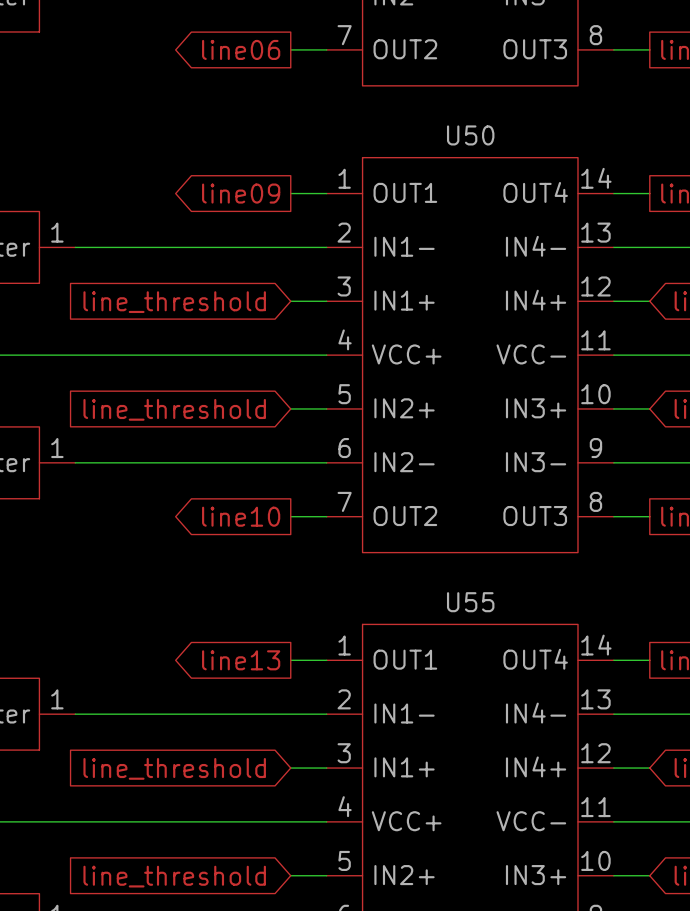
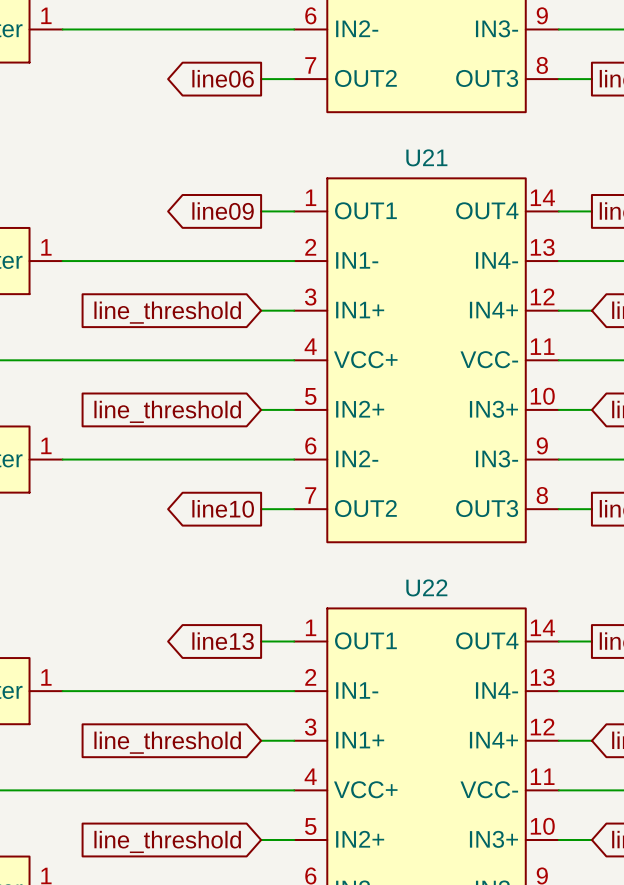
U50 name: U50 (470, 135) -> U21 (426, 157)
U55 name: U55 (470, 602) -> U22 (426, 587)

